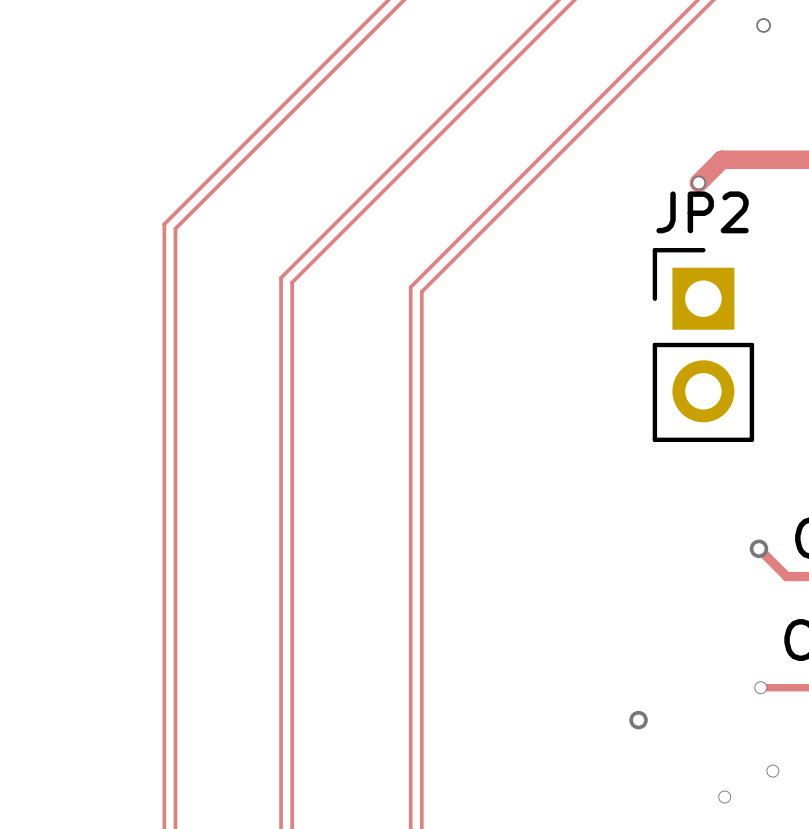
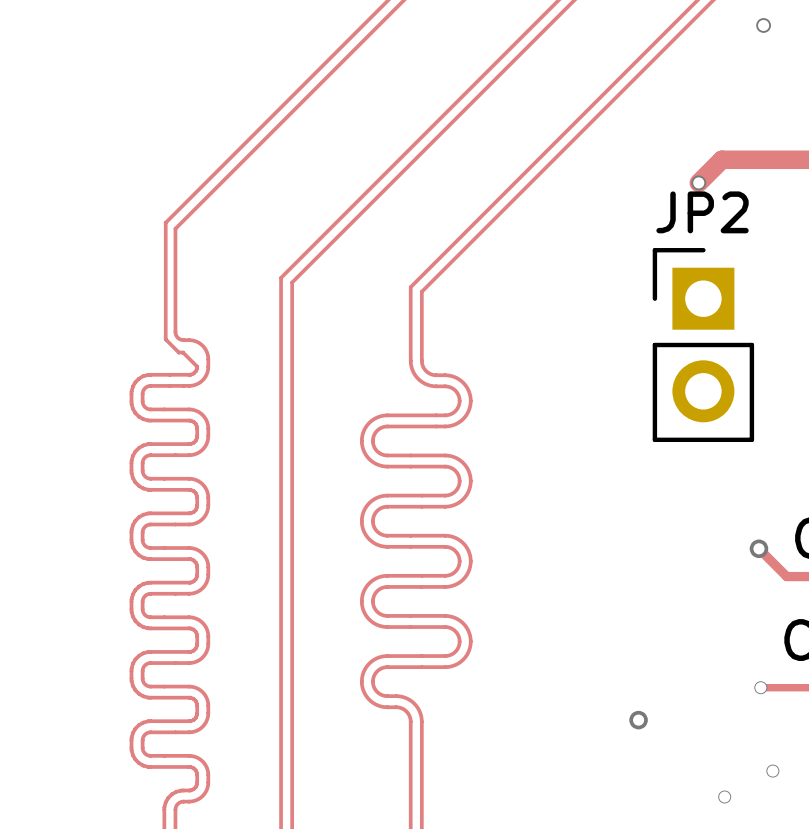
track: (165, 222) (164, 809) -> (165, 222) (165, 339) (178, 352) (183, 352) (197, 368) (190, 374) (143, 376) (135, 382) (131, 394) (132, 408) (143, 419) (190, 420) (197, 427) (197, 437) (193, 442) (143, 445) (135, 451) (131, 460) (132, 478) (143, 488) (190, 489) (197, 496) (197, 506) (193, 512) (143, 514) (135, 520) (131, 530) (132, 547) (143, 557) (190, 559) (197, 565) (197, 576) (193, 581) (143, 584) (135, 590) (131, 599) (132, 616) (143, 627) (190, 628) (197, 634) (197, 645) (193, 650) (143, 653) (135, 659) (131, 668) (132, 685) (143, 696) (190, 697) (197, 704) (197, 714) (193, 719) (148, 721) (138, 725) (132, 733) (131, 750) (138, 763) (148, 766) (190, 767) (197, 773) (195, 786) (190, 790) (181, 790) (171, 794) (165, 802) (164, 809)
track: (175, 332) (175, 809) -> (175, 332) (180, 339) (194, 340) (200, 344) (206, 351) (208, 359) (206, 374) (198, 383) (189, 385) (149, 385) (144, 388) (142, 392) (142, 403) (146, 408) (194, 410) (204, 416) (208, 426) (206, 443) (198, 452) (189, 455) (149, 455) (144, 457) (142, 462) (142, 472) (146, 477) (194, 479) (204, 486) (208, 495) (206, 512) (198, 521) (189, 524) (149, 524) (144, 526) (142, 531) (142, 542) (146, 546) (194, 548) (204, 555) (208, 564) (206, 581) (198, 591) (189, 593) (149, 593) (144, 596) (142, 600) (142, 611) (146, 616) (194, 617) (202, 622) (208, 633) (206, 651) (198, 660) (189, 663) (149, 663) (144, 665) (142, 670) (142, 680) (147, 685) (194, 687) (202, 692) (207, 700) (207, 718) (198, 729) (189, 732) (149, 732) (142, 738) (142, 749) (147, 755) (194, 756) (200, 759) (206, 767) (208, 784) (204, 794) (196, 800) (179, 802) (175, 809)
track: (410, 360) (410, 721) -> (410, 360) (413, 371) (420, 380) (430, 385) (451, 387) (457, 393) (459, 400) (456, 409) (448, 415) (378, 416) (367, 425) (361, 438) (365, 454) (378, 465) (446, 466) (454, 469) (459, 477) (457, 488) (449, 494) (381, 496) (369, 503) (362, 515) (364, 532) (376, 544) (387, 546) (446, 546) (455, 551) (459, 558) (457, 569) (449, 574) (381, 576) (371, 581) (363, 592) (361, 604) (364, 612) (376, 624) (387, 627) (446, 627) (454, 630) (458, 636) (458, 647) (449, 655) (384, 656) (373, 659) (365, 668) (361, 684) (367, 697) (378, 705) (403, 709) (408, 714) (410, 721)
track: (421, 360) (421, 721) -> (421, 360) (424, 368) (430, 373) (450, 375) (461, 380) (468, 389) (470, 400) (466, 414) (453, 425) (384, 426) (377, 430) (373, 439) (376, 450) (384, 455) (453, 456) (465, 465) (470, 475) (468, 492) (456, 504) (445, 506) (385, 506) (378, 509) (373, 517) (375, 528) (382, 534) (450, 536) (463, 543) (470, 555) (468, 572) (456, 584) (445, 586) (385, 587) (378, 590) (373, 596) (374, 607) (382, 615) (450, 616) (461, 621) (469, 633) (470, 644) (468, 652) (456, 664) (445, 667) (385, 667) (378, 670) (374, 675) (373, 684) (377, 691) (384, 695) (399, 696) (409, 700) (417, 708) (421, 721)

